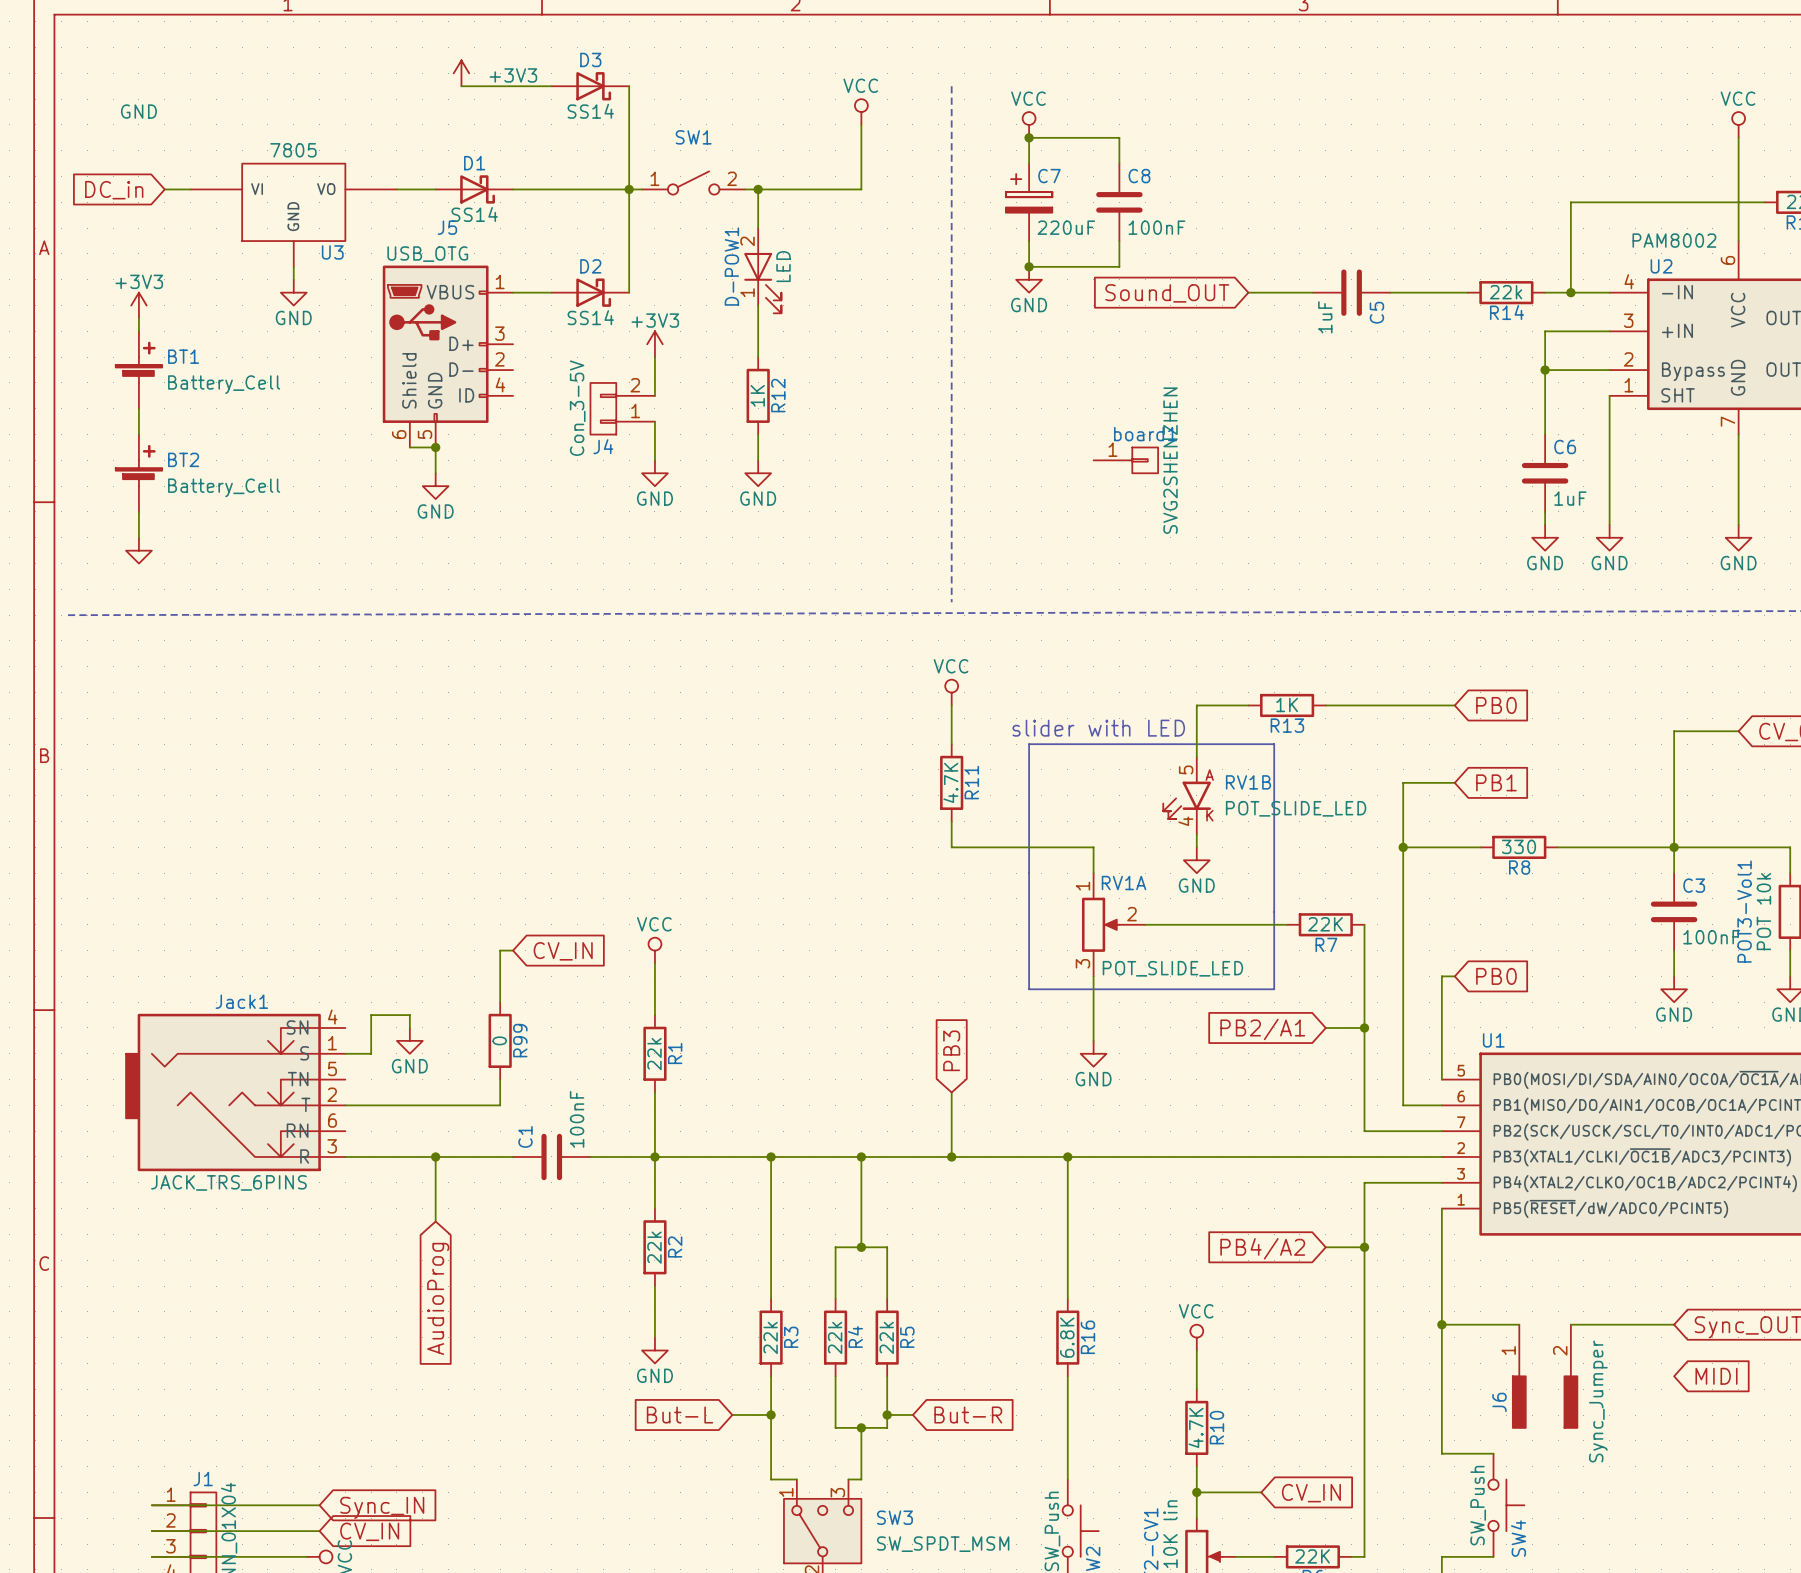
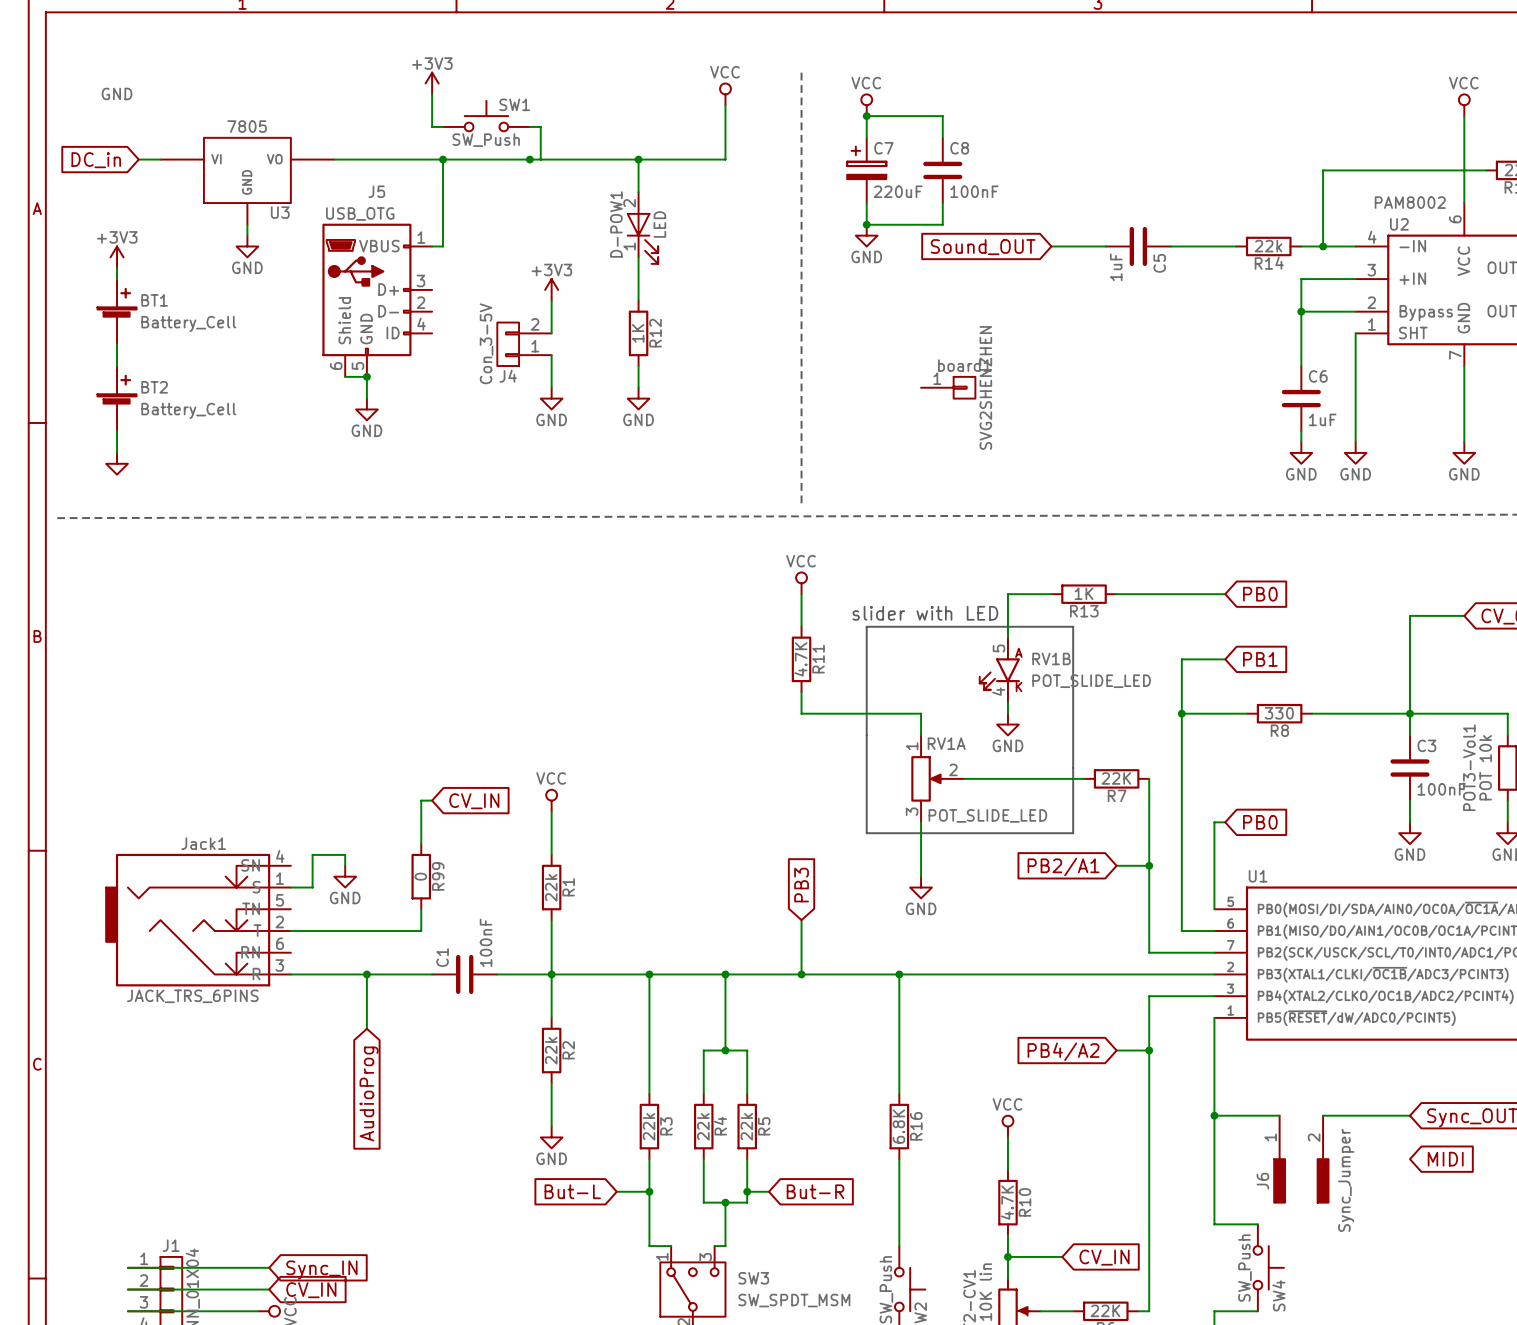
power symbol position: +3V3 (461, 73) -> +3V3 (432, 83)
wire: (461, 86) (551, 86) -> none
D3: SS14 (590, 86) -> none
wire: (629, 86) (629, 292) -> none
wire: none -> (432, 94) (432, 126) (442, 126)
SW1 name position: SW1 (693, 137) -> SW1 (514, 104)
wire: none -> (529, 126) (540, 126) (540, 159) (627, 159)
SW1 value: none -> SW_Push (486, 140)
SW1 symbol: [642, 171, 746, 195] -> [442, 100, 530, 132]
D1: SS14 (474, 189) -> none
junction: none -> (442, 159)
wire: (525, 292) (551, 292) -> (442, 246) (442, 159)
D2: SS14 (590, 292) -> none

